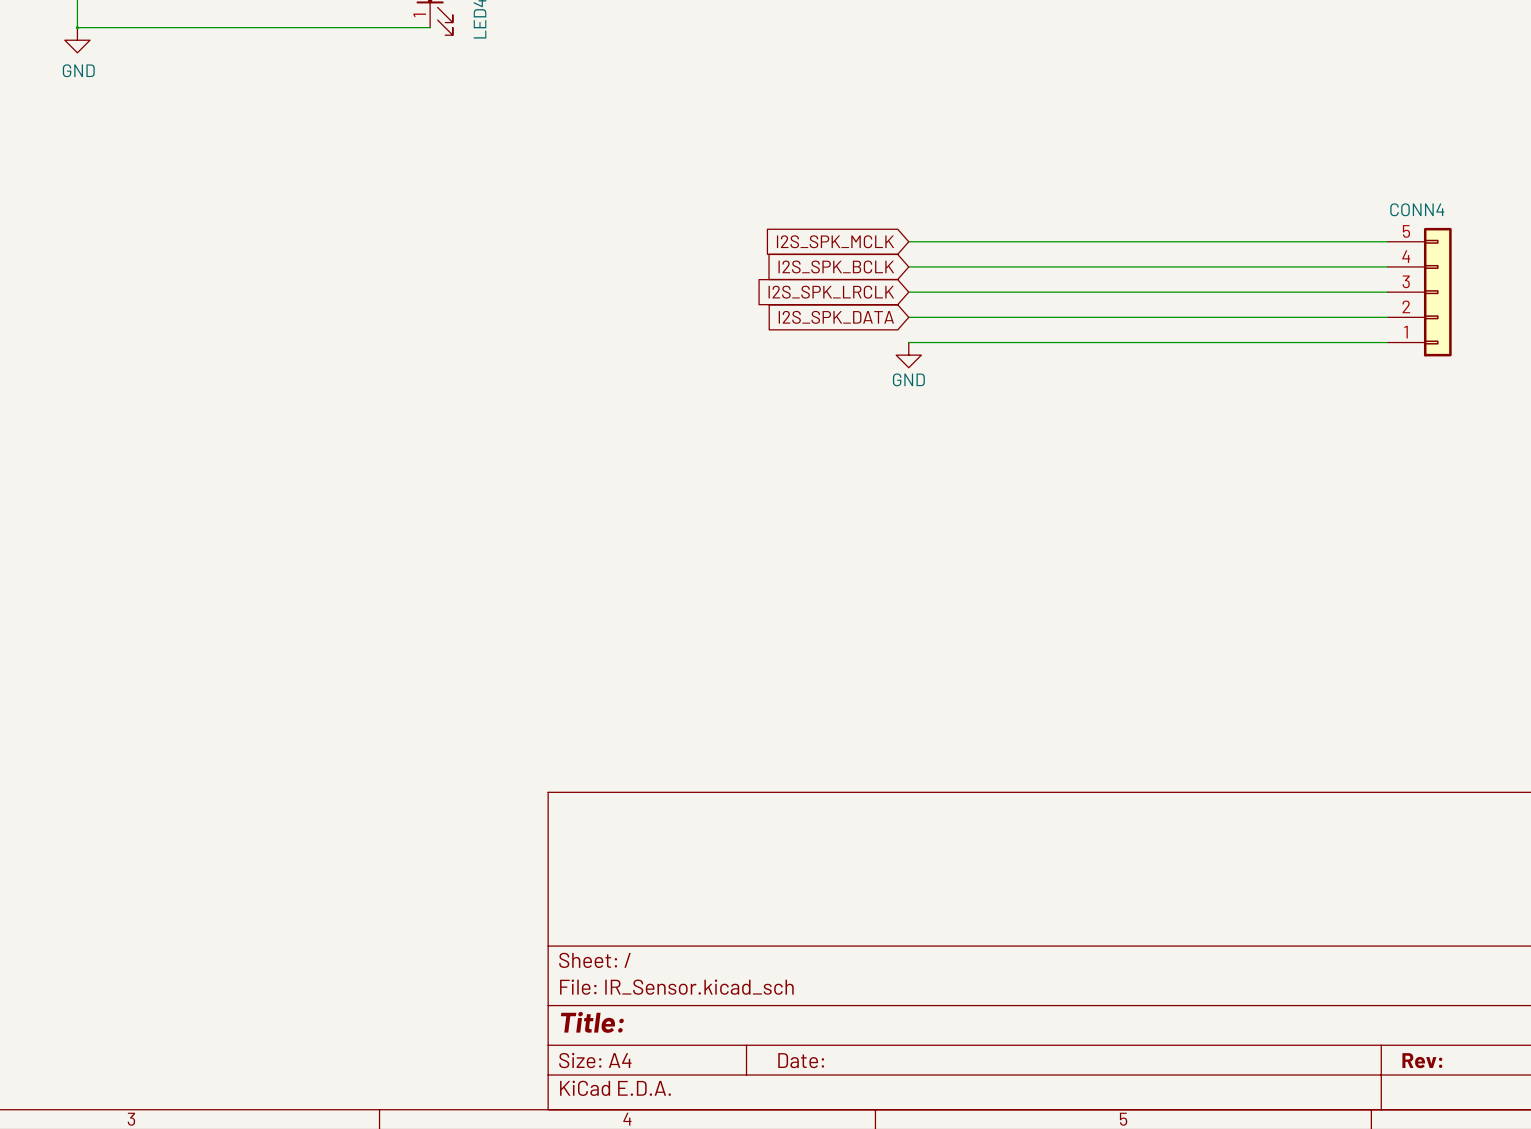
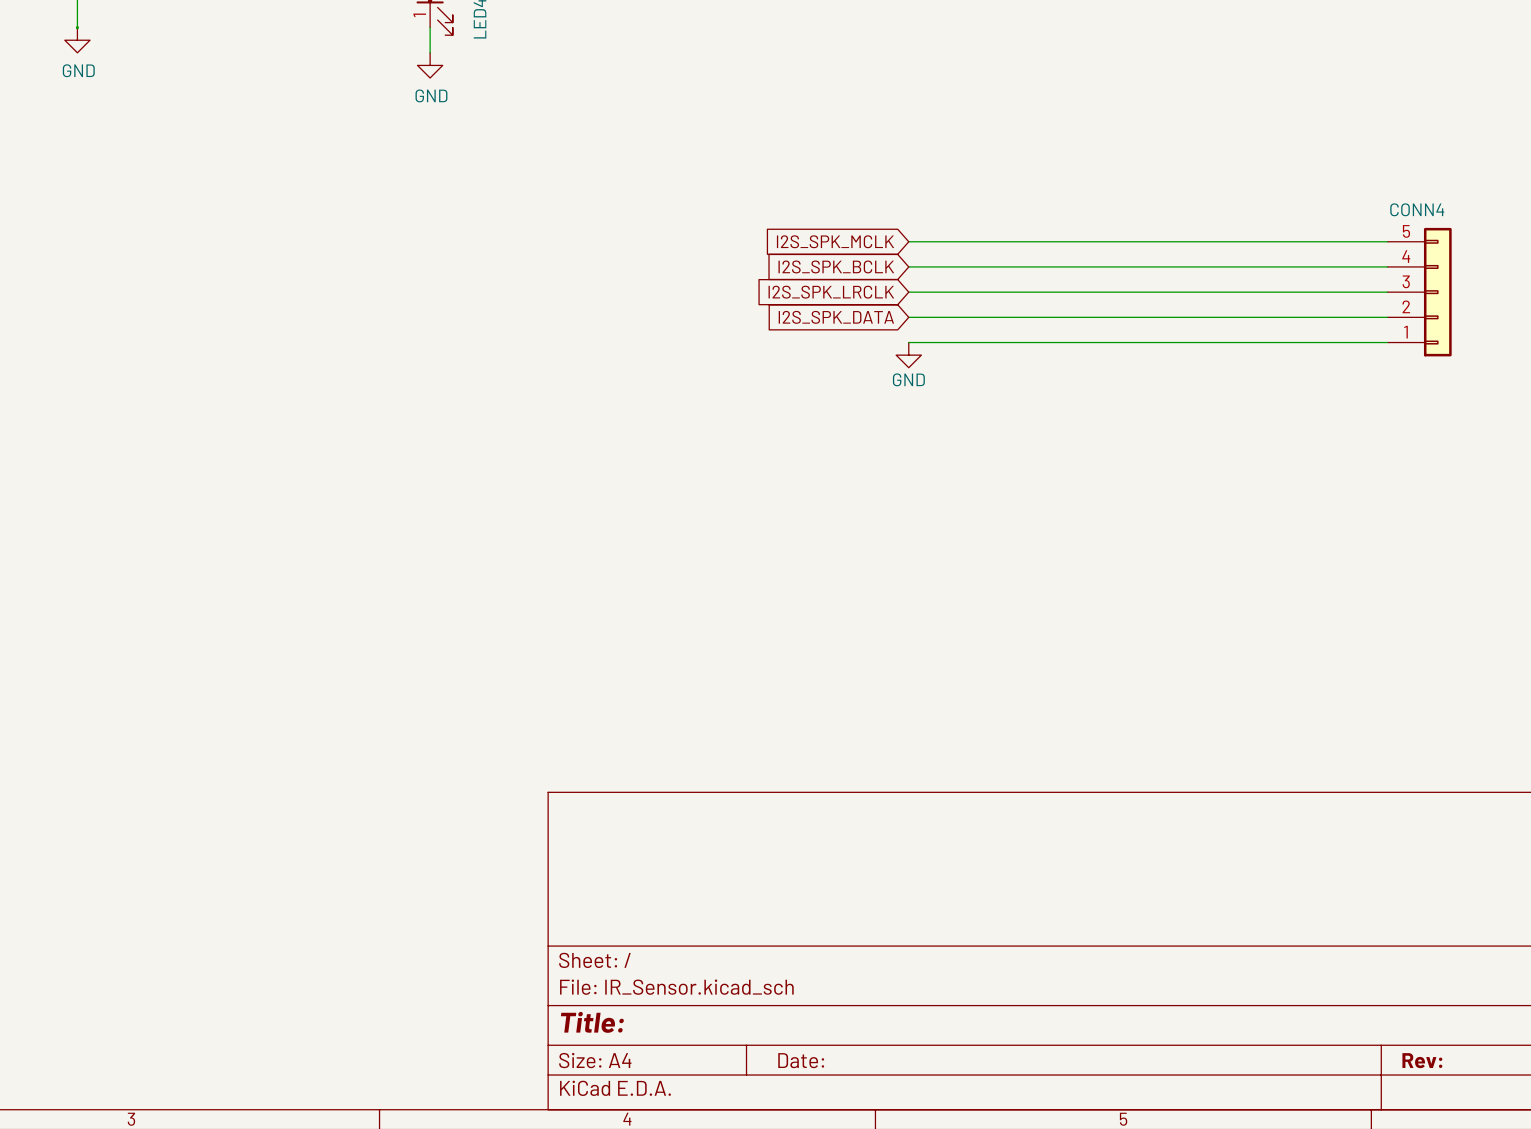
wire: (77, 27) (430, 27) -> (430, 52) (430, 27)
power symbol: none -> GND (430, 65)

